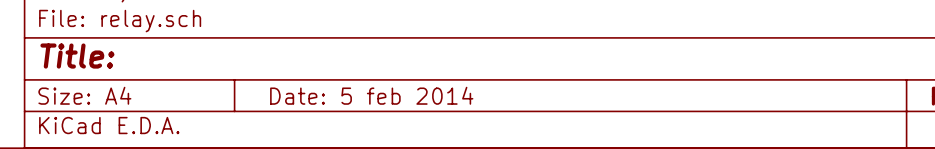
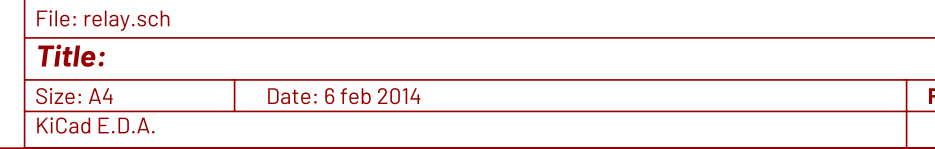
title block: Date: 5 feb 2014 (371, 95) -> Date: 6 feb 2014 (344, 96)

